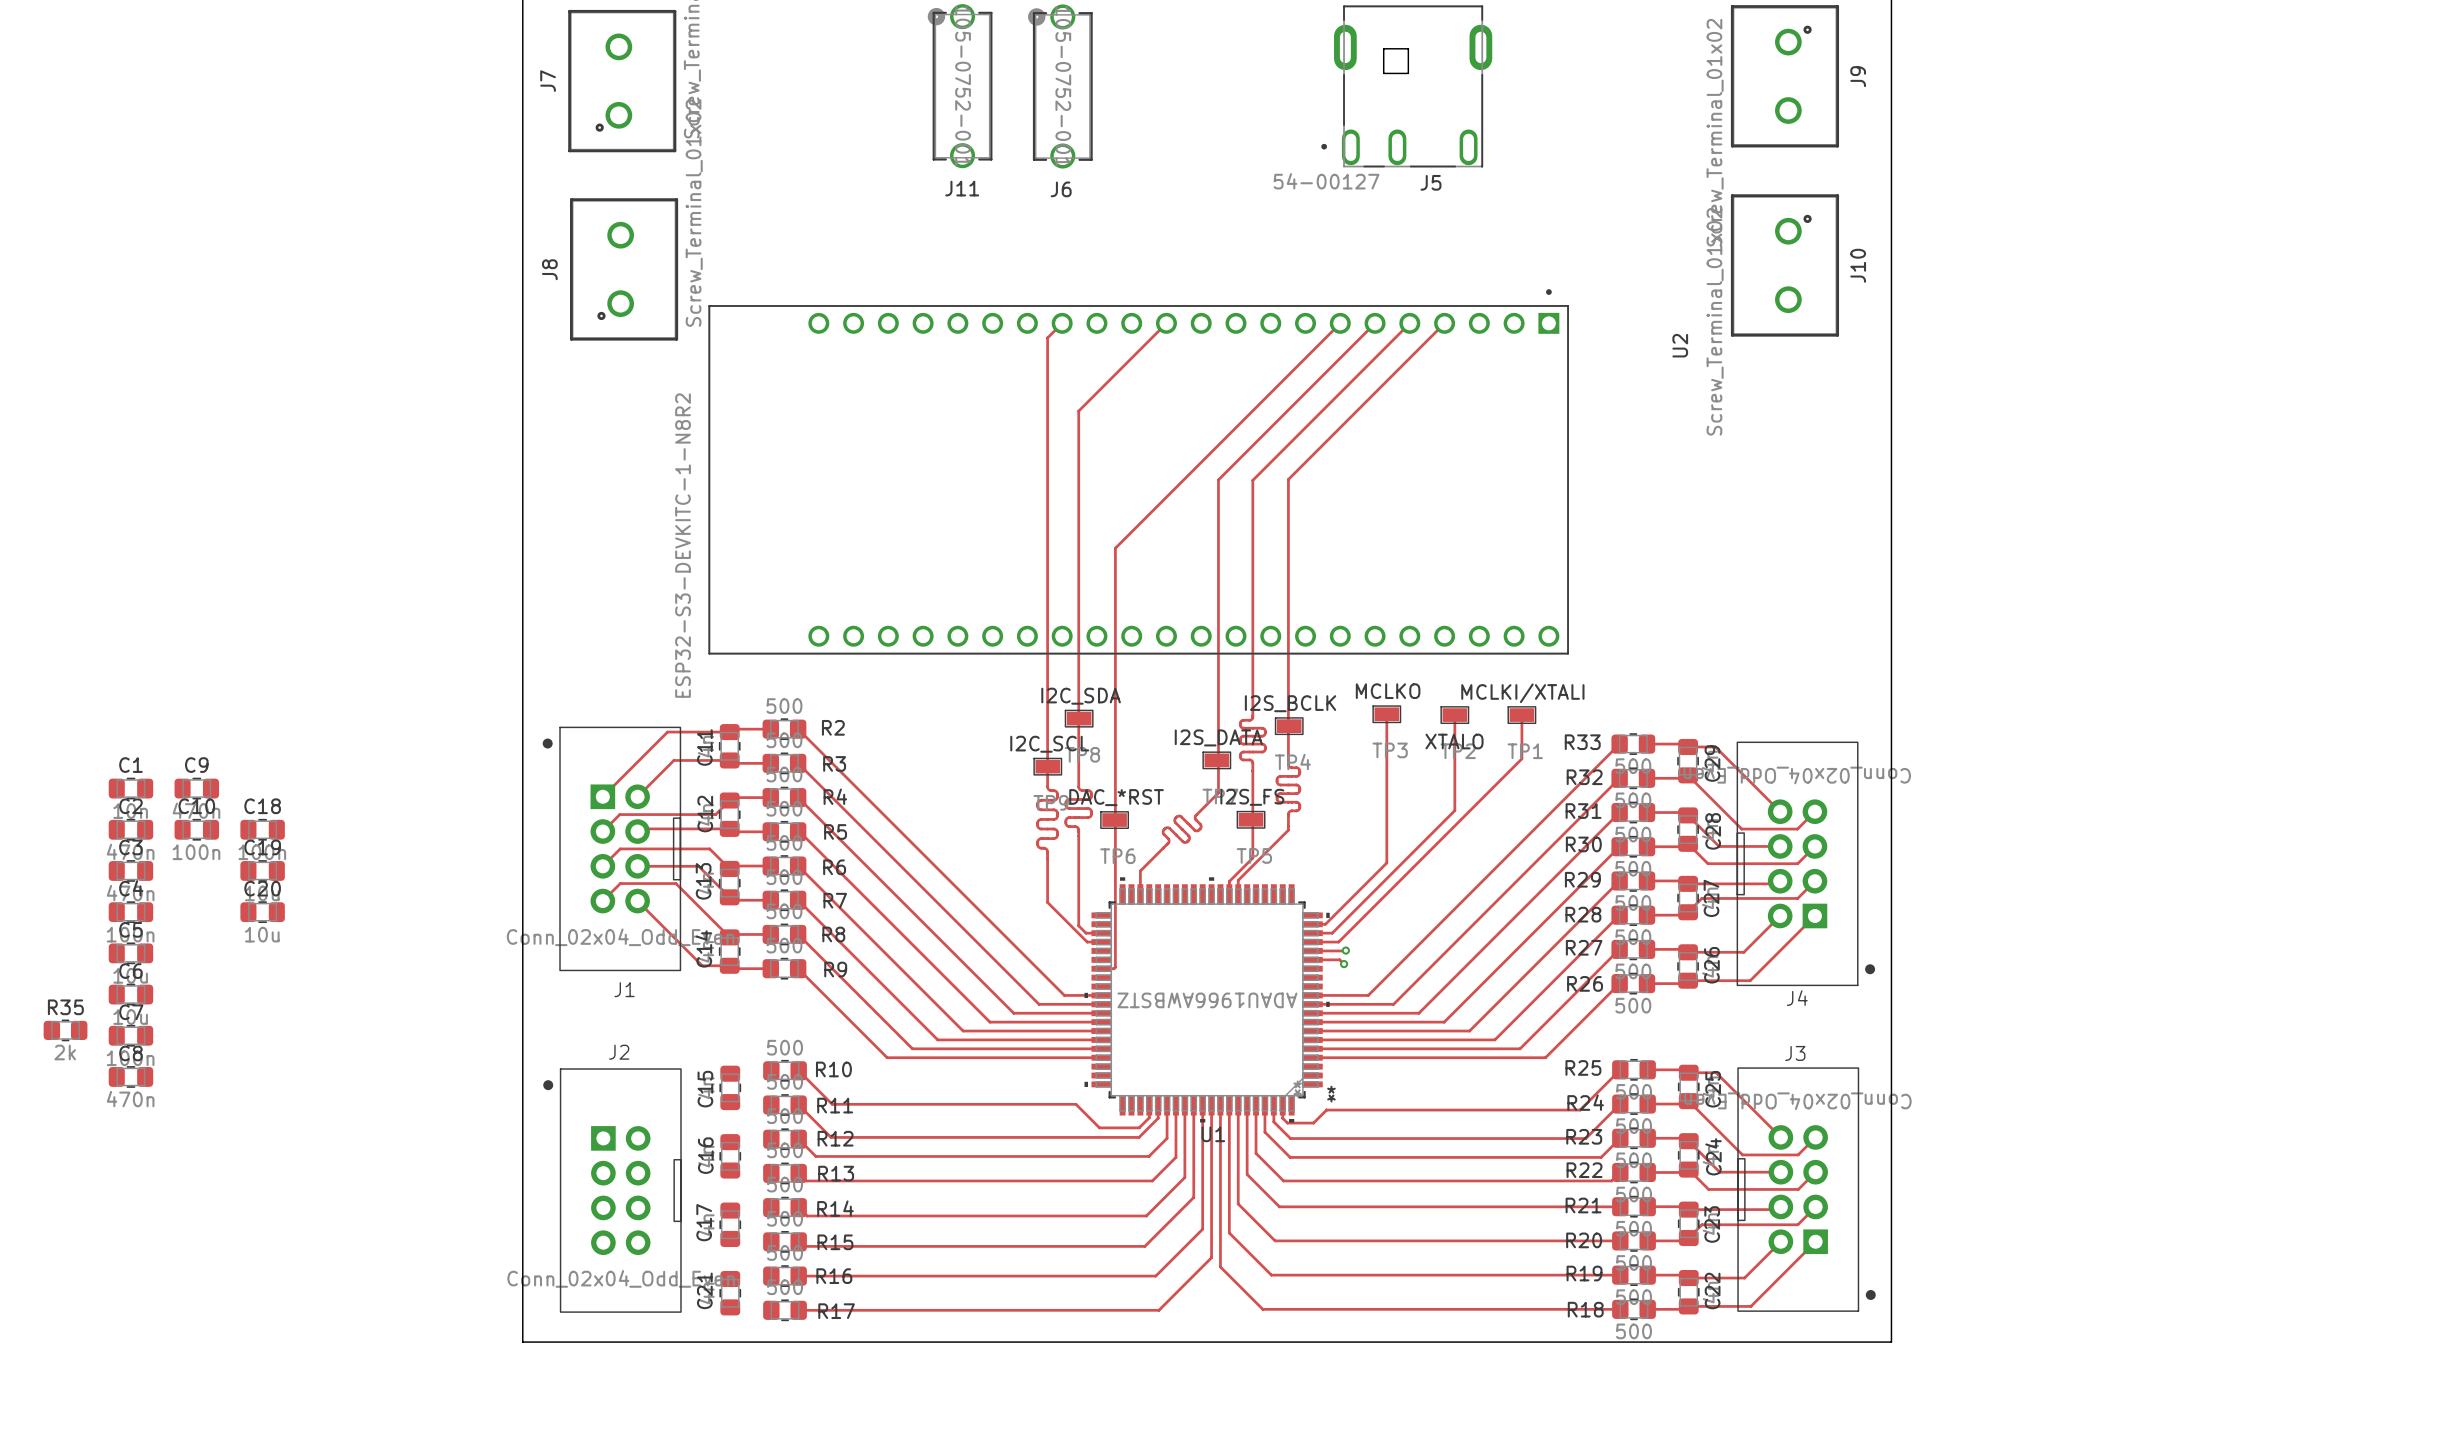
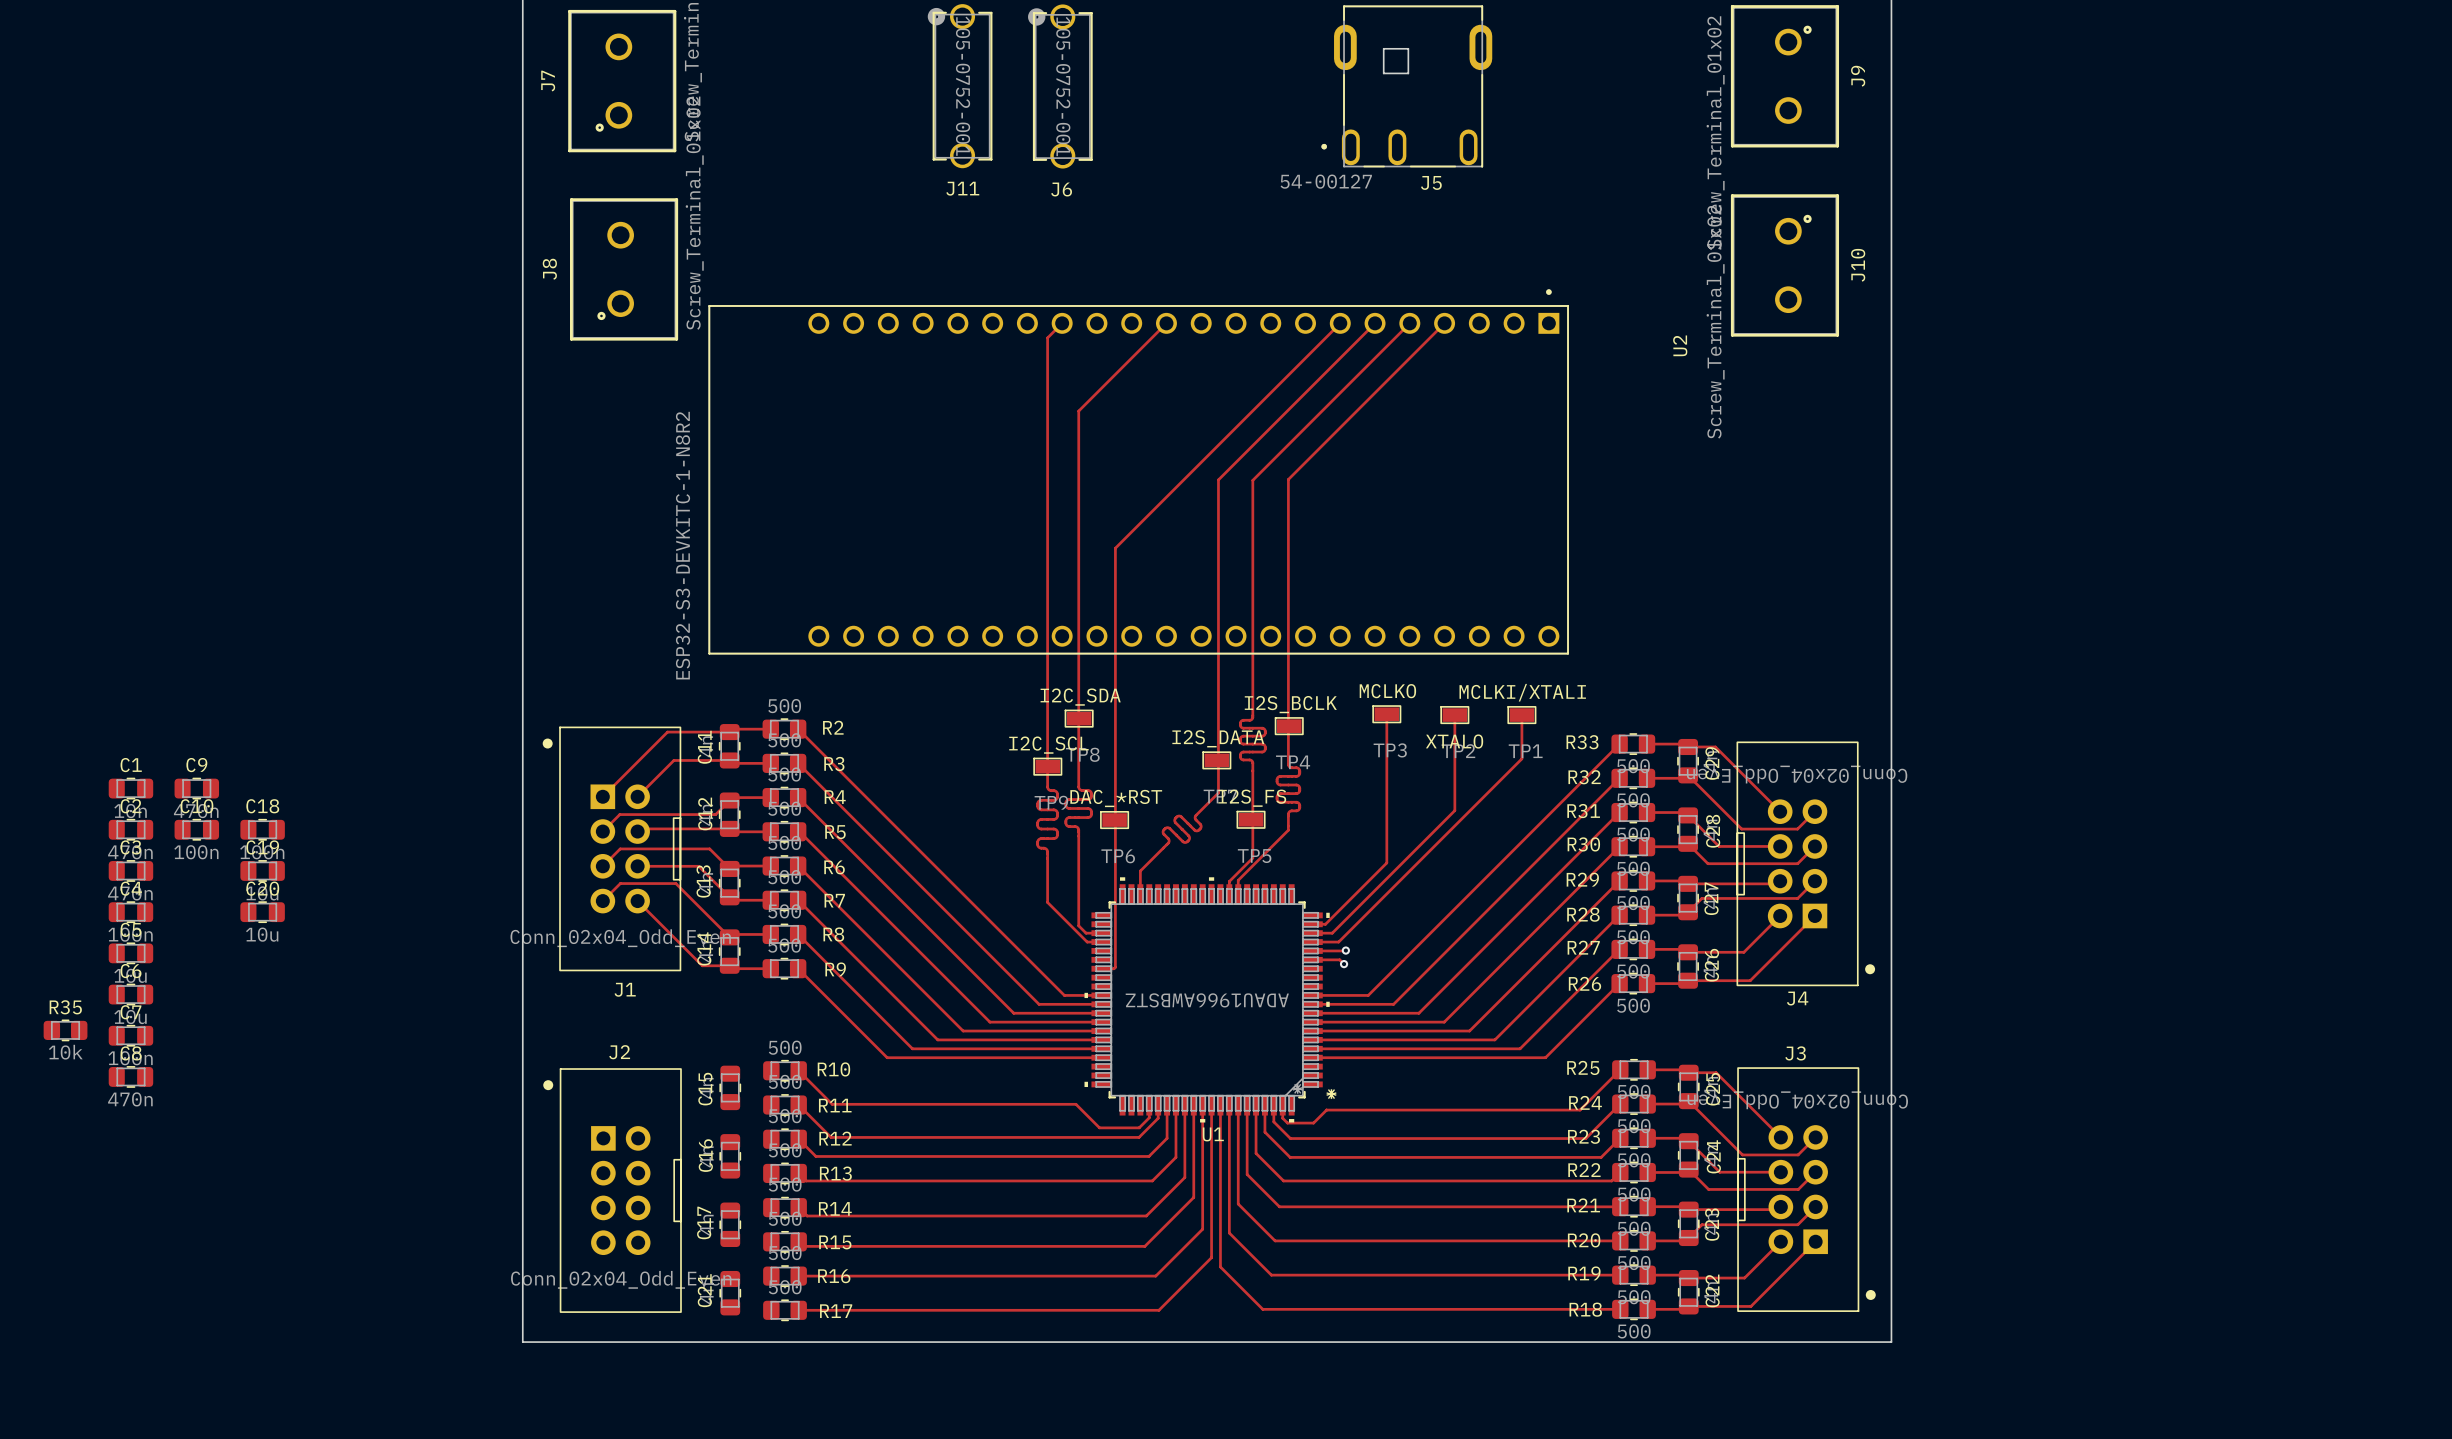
R35 value: 2k (65, 1052) -> 10k (65, 1052)

